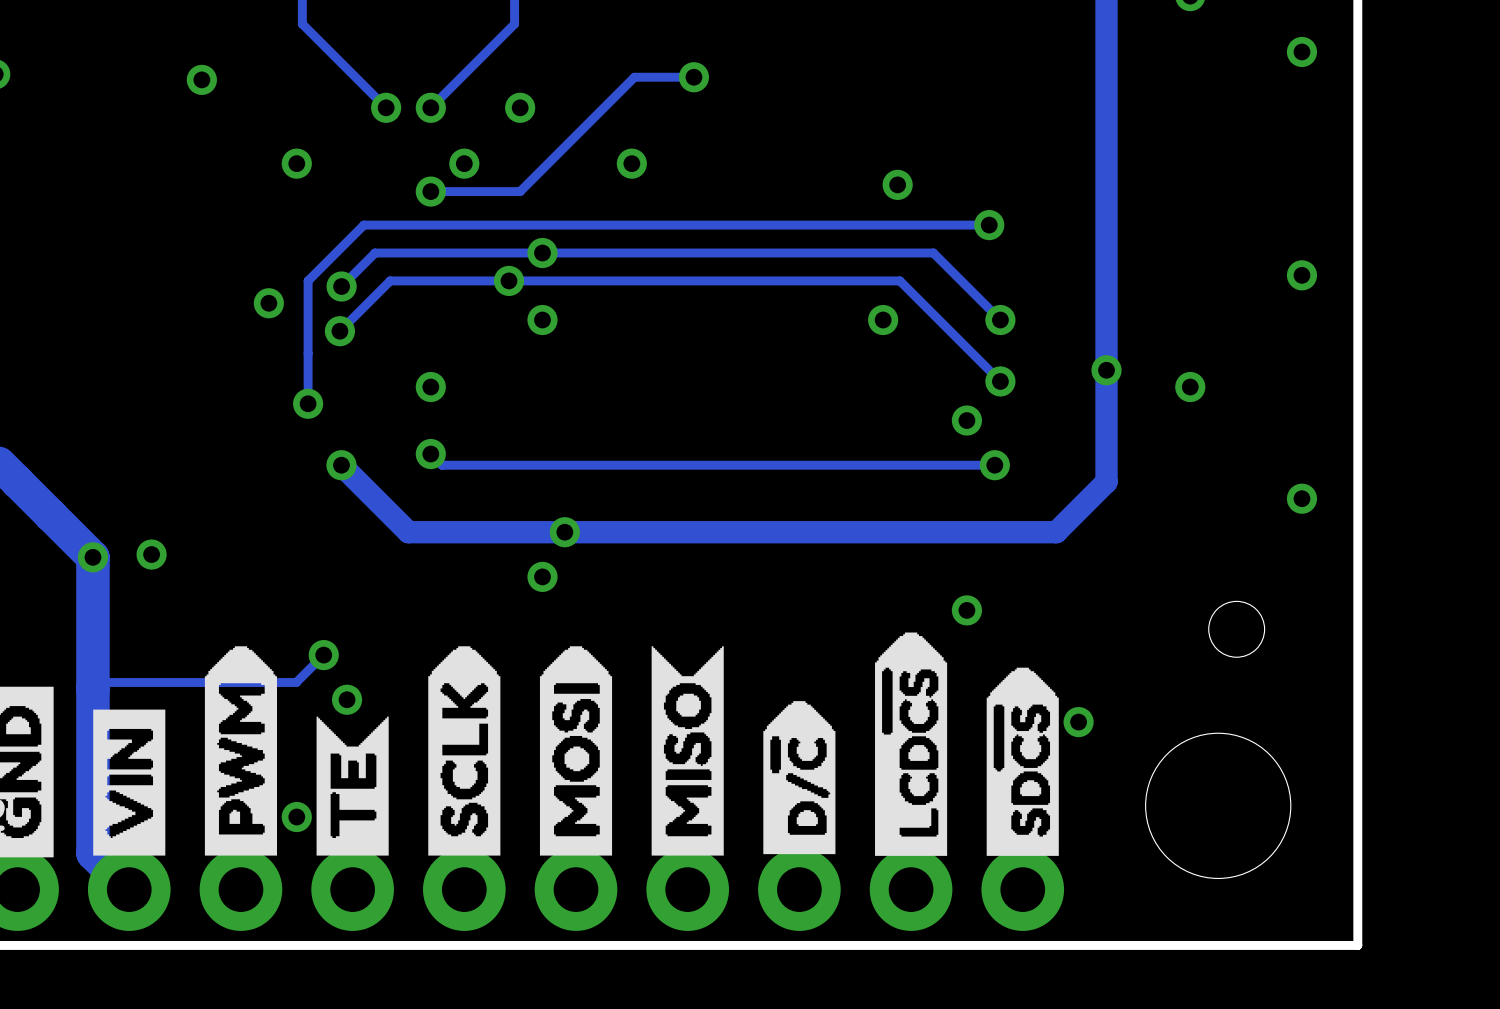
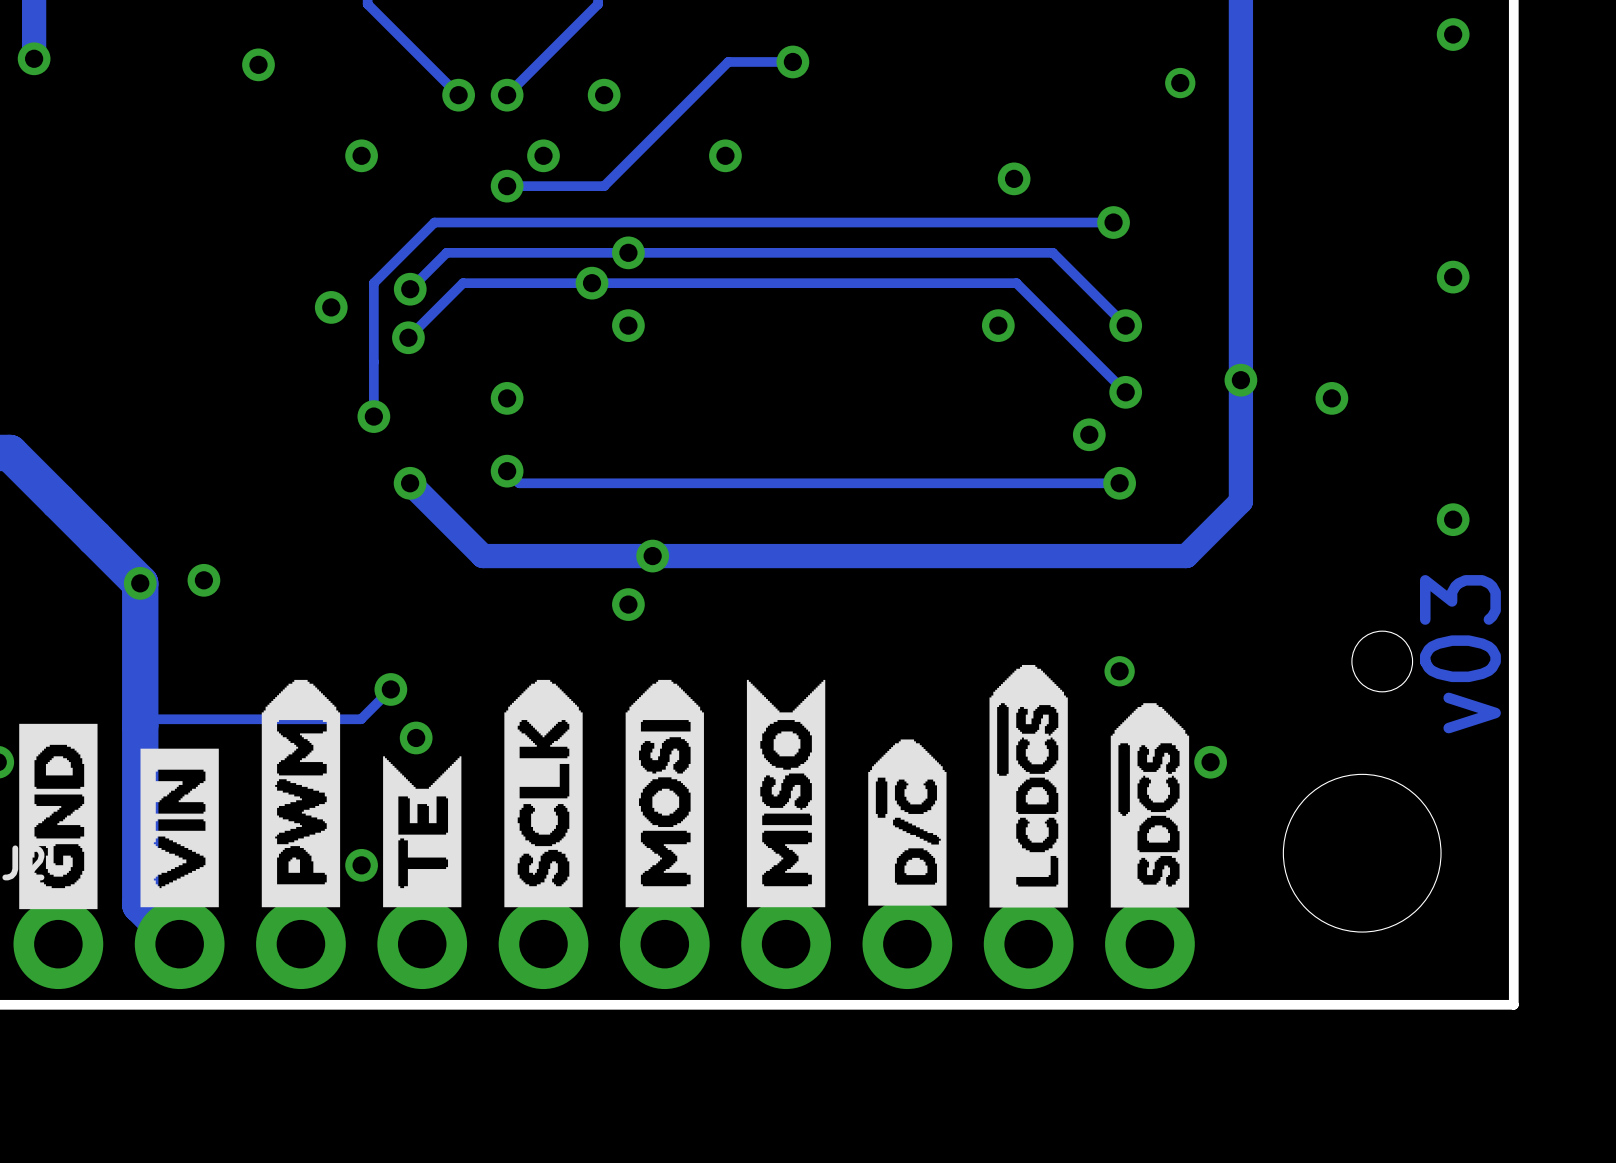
via: none -> (1180, 83)
via position: (966, 610) -> (1119, 671)
text: none -> v03 (1460, 654)

